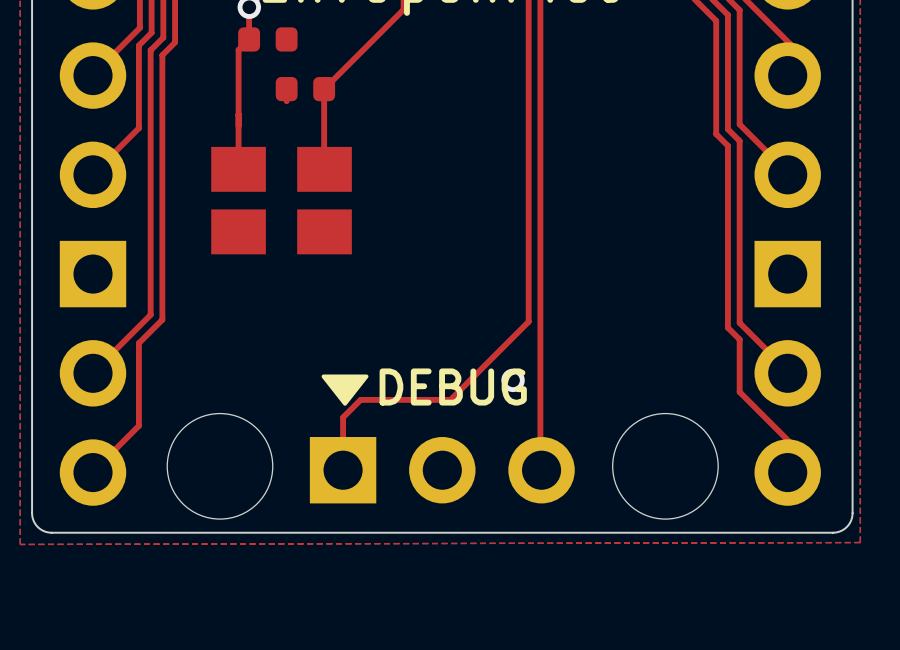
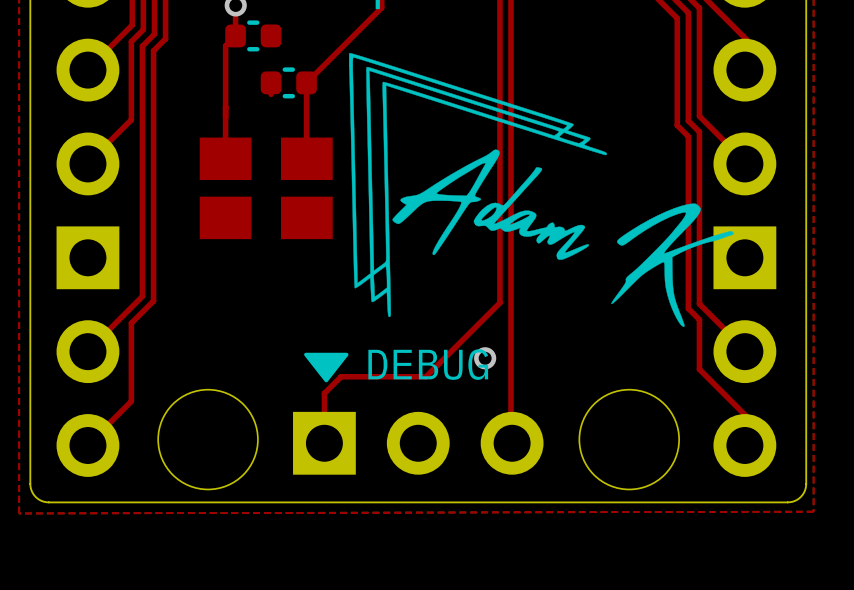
part footprint: [238, 27, 298, 52] -> [225, 20, 282, 52]
drawing: none -> [348, 52, 734, 327]
part footprint: [275, 76, 336, 102] -> [260, 67, 317, 99]

